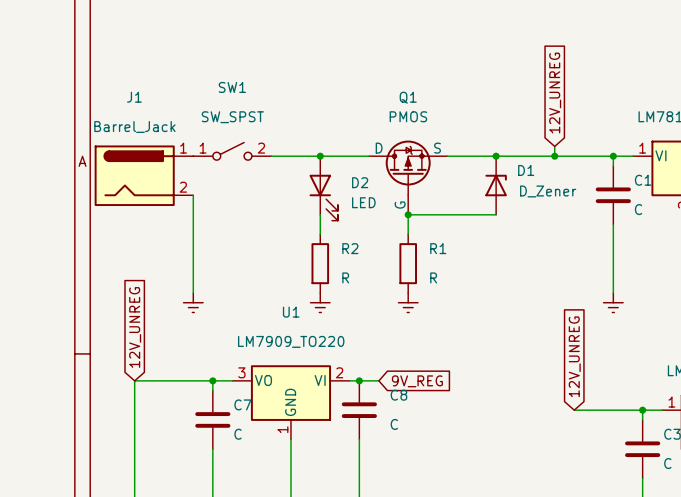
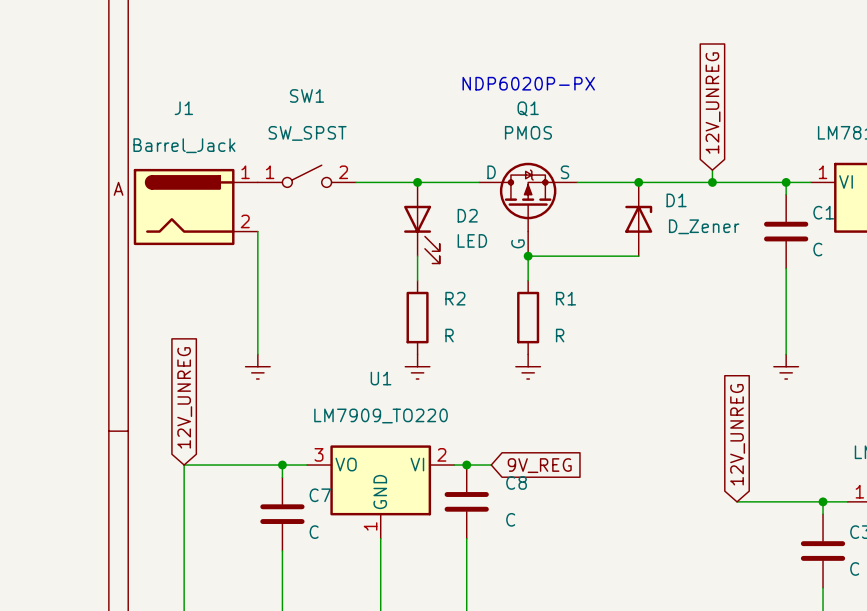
text: none -> NDP6020P-PX (528, 83)

